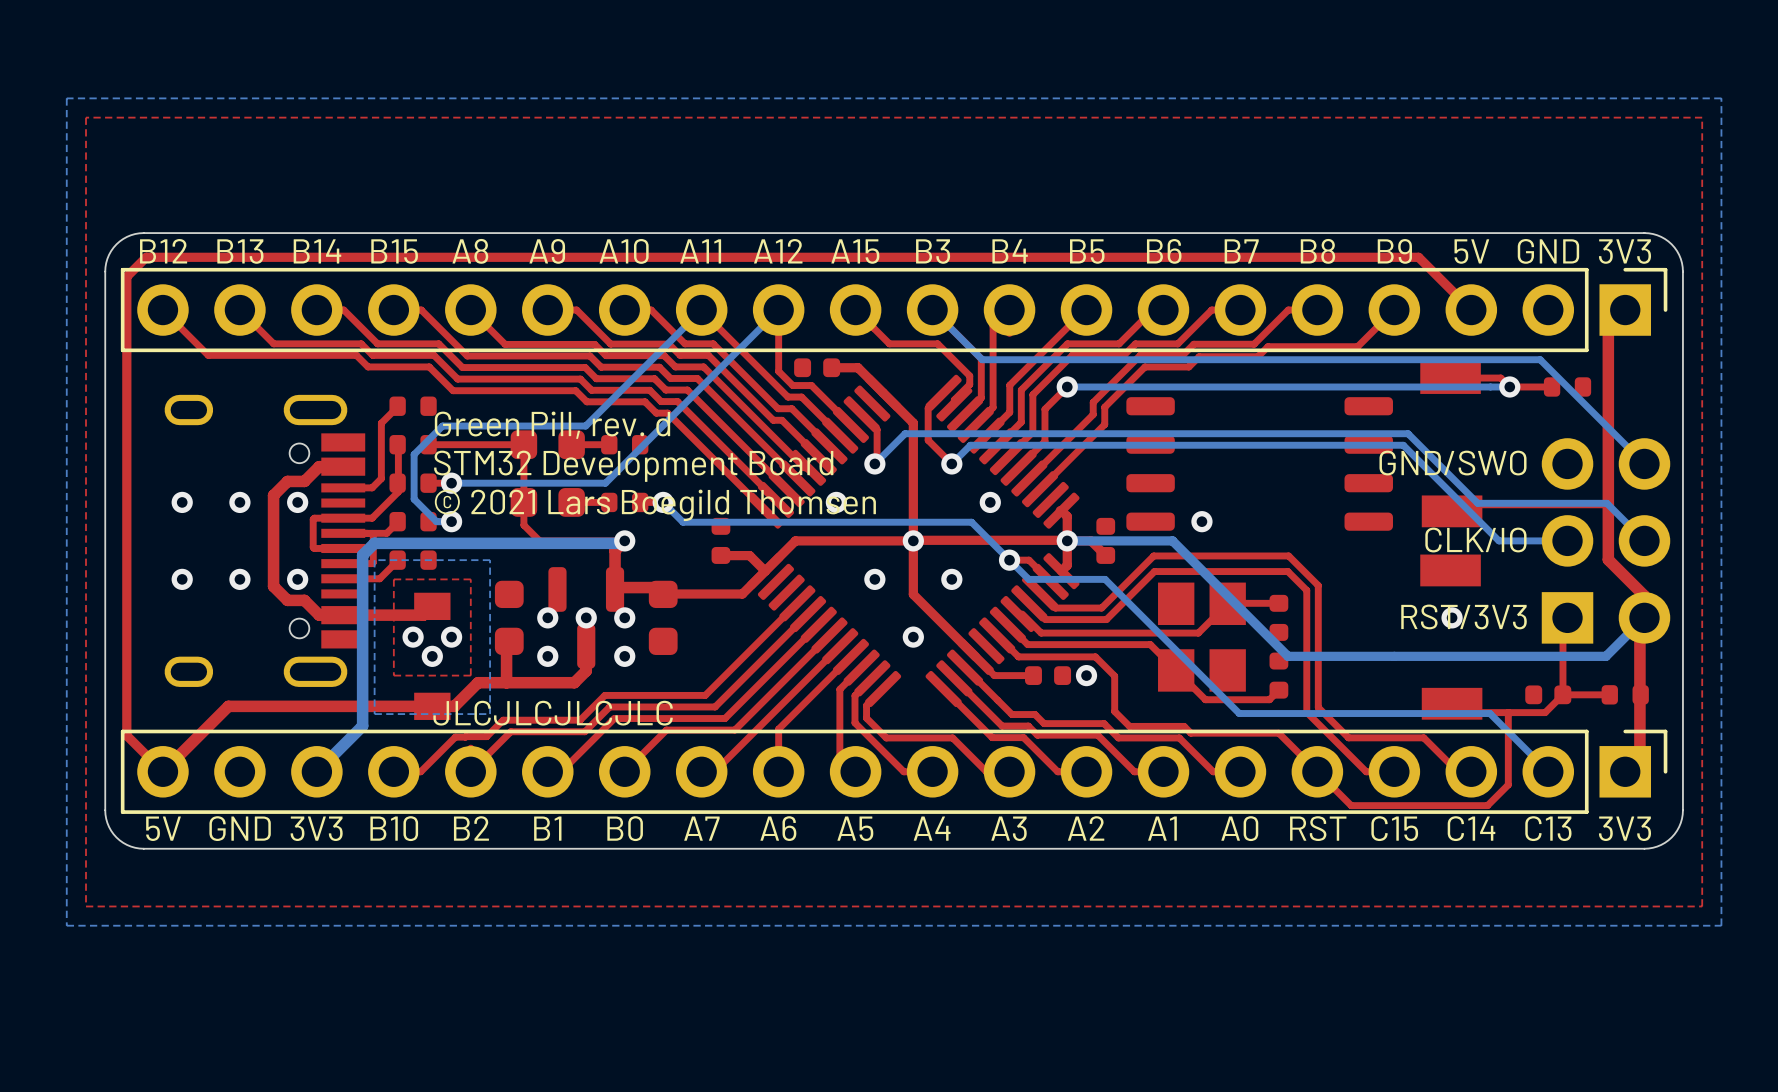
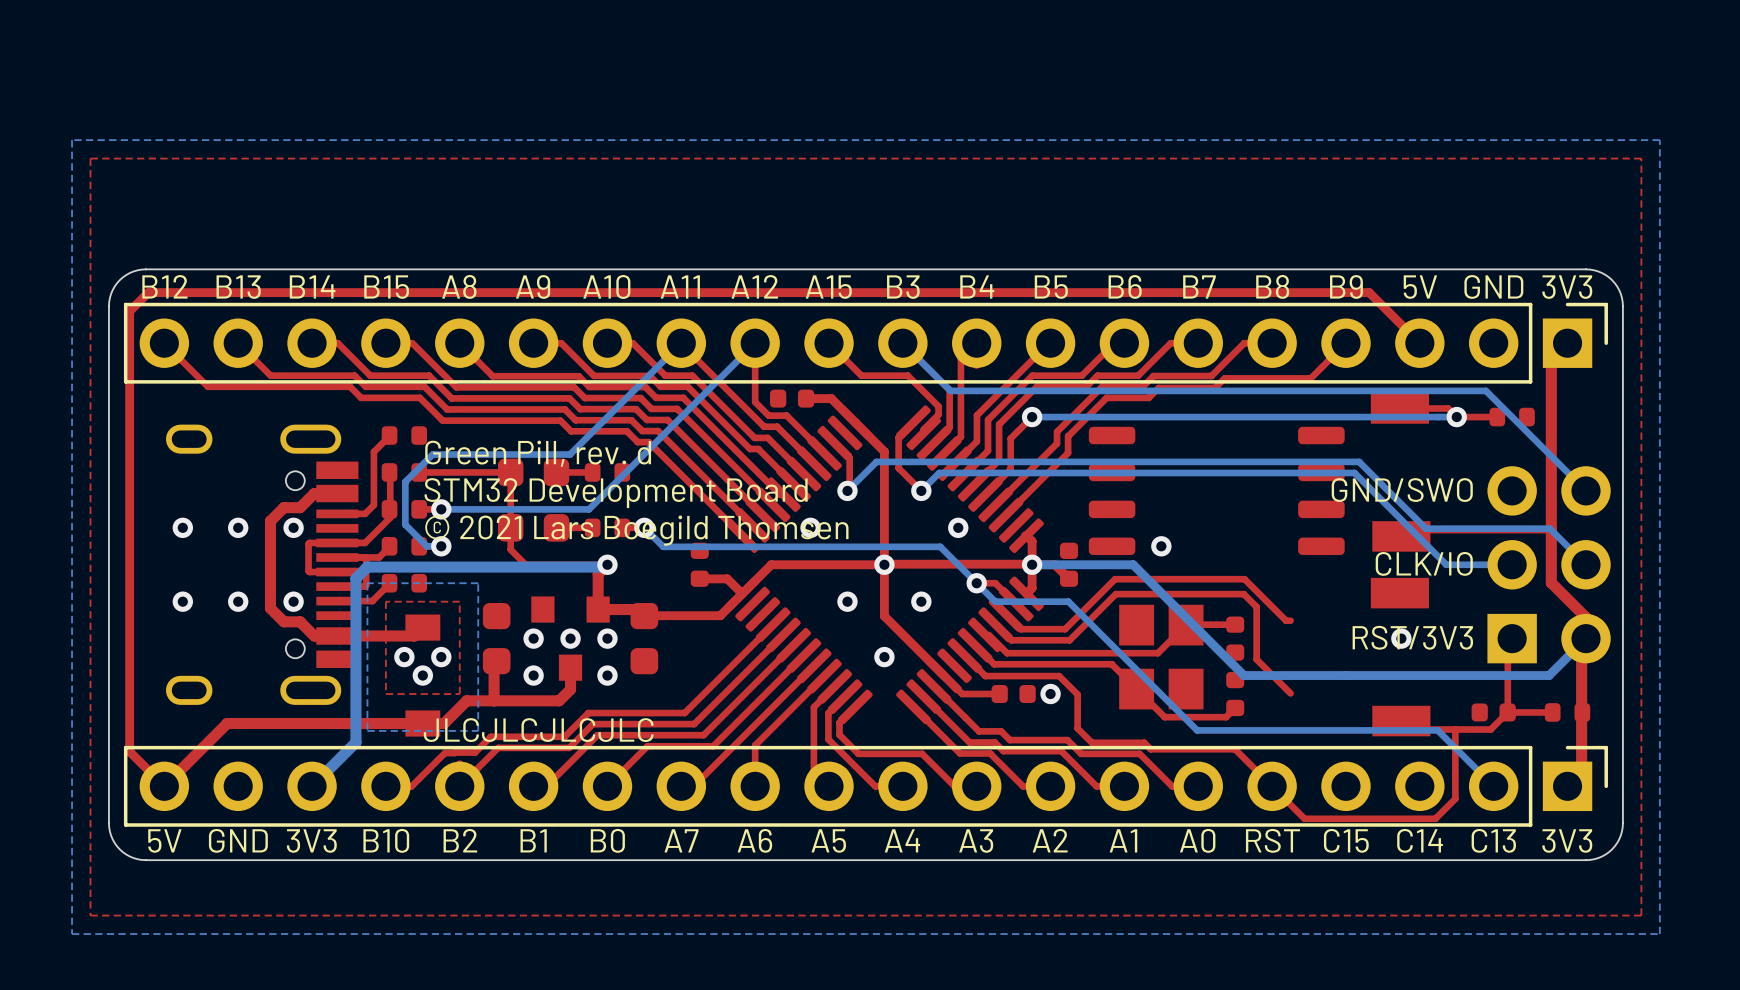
part footprint: [548, 567, 625, 669] -> [531, 596, 610, 681]
top track: (1301, 584) (1306, 590) (1306, 712) (1366, 771) (1394, 771) -> (1256, 606) (1256, 659) (1290, 693)
top track: (1318, 585) (1318, 707) (1348, 737) (1423, 737) (1457, 771) (1471, 771) -> (1273, 607) (1286, 620) (1290, 620)

